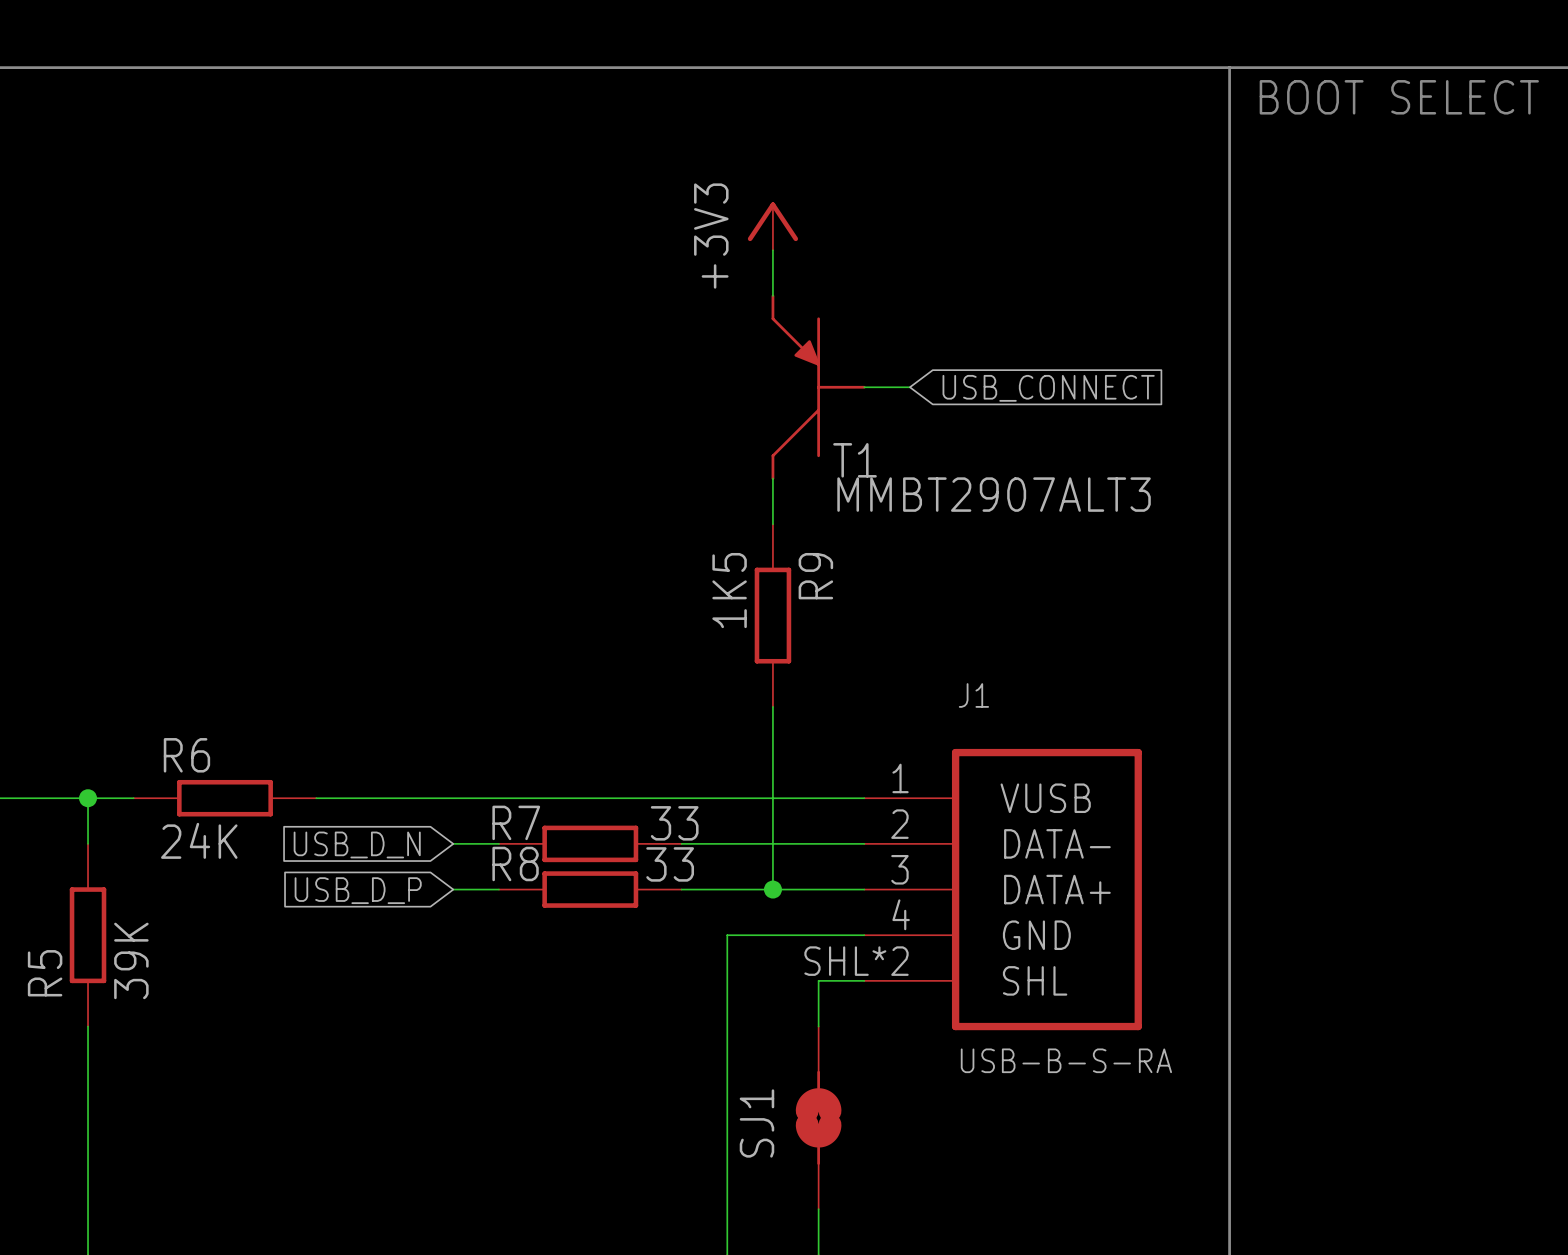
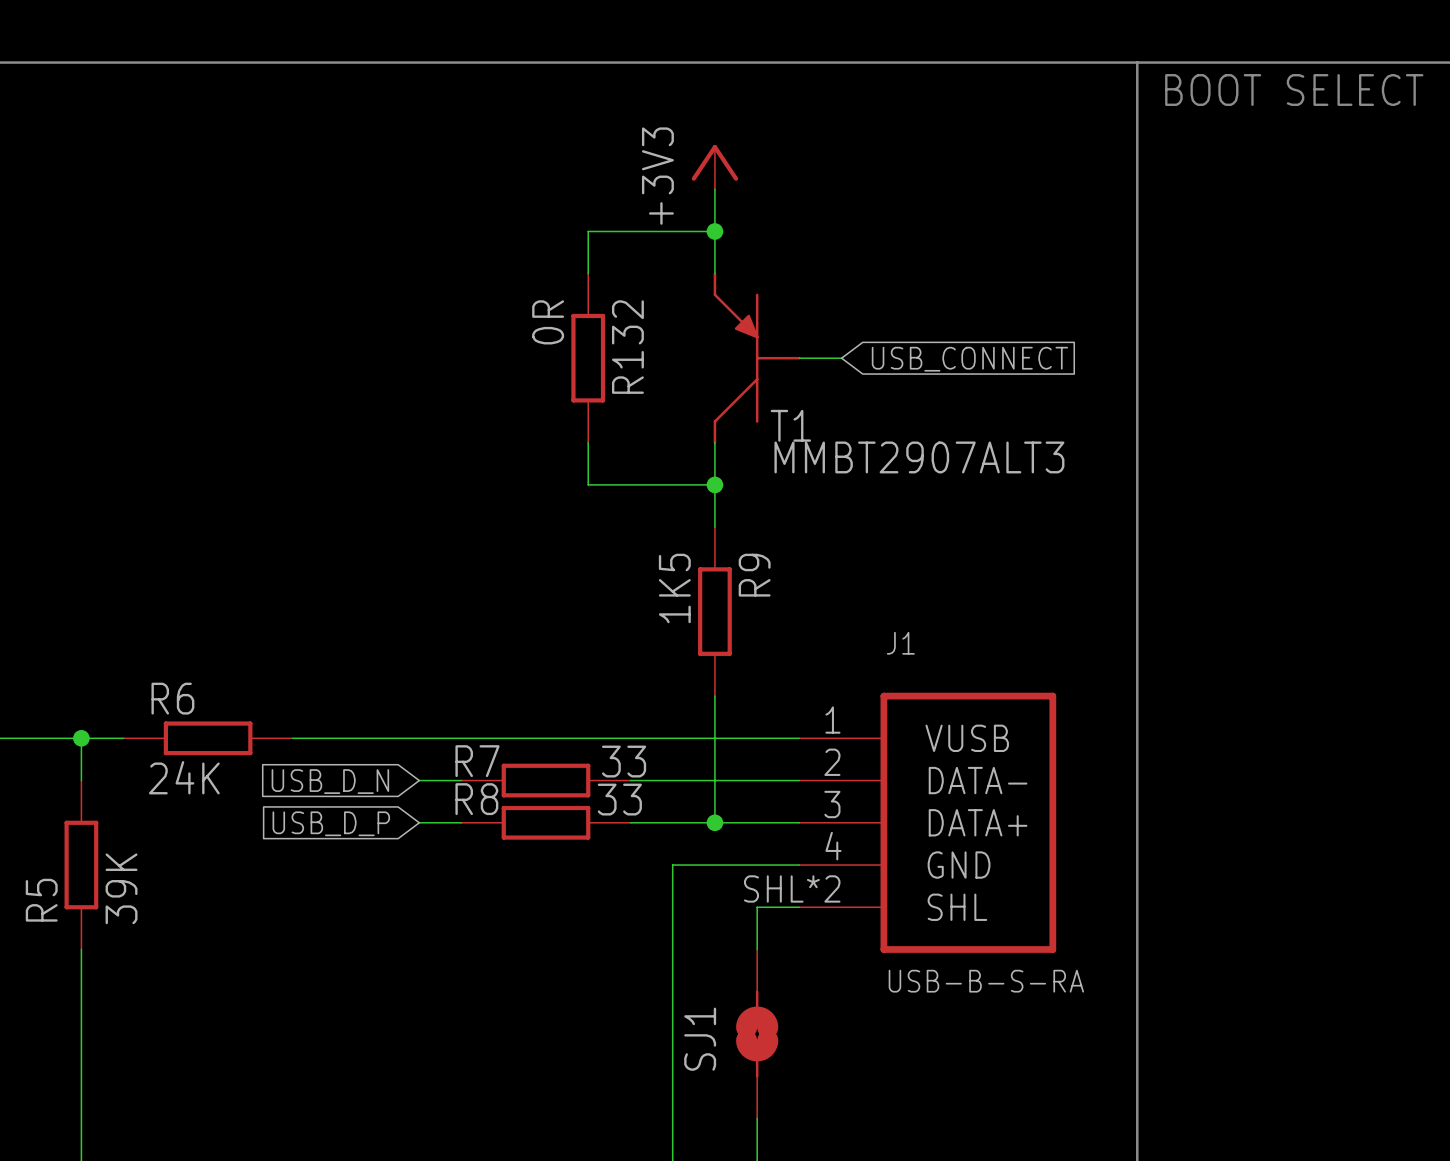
wire: none -> (714, 189) (714, 231) (588, 231) (588, 273)
power symbol position: +3V3 (772, 226) -> +3V3 (714, 167)
junction: none -> (714, 231)
R132: none -> 0R (588, 358)
wire: none -> (588, 442) (588, 484) (714, 484) (714, 527)
junction: none -> (714, 484)
R9 position: (772, 615) -> (714, 611)

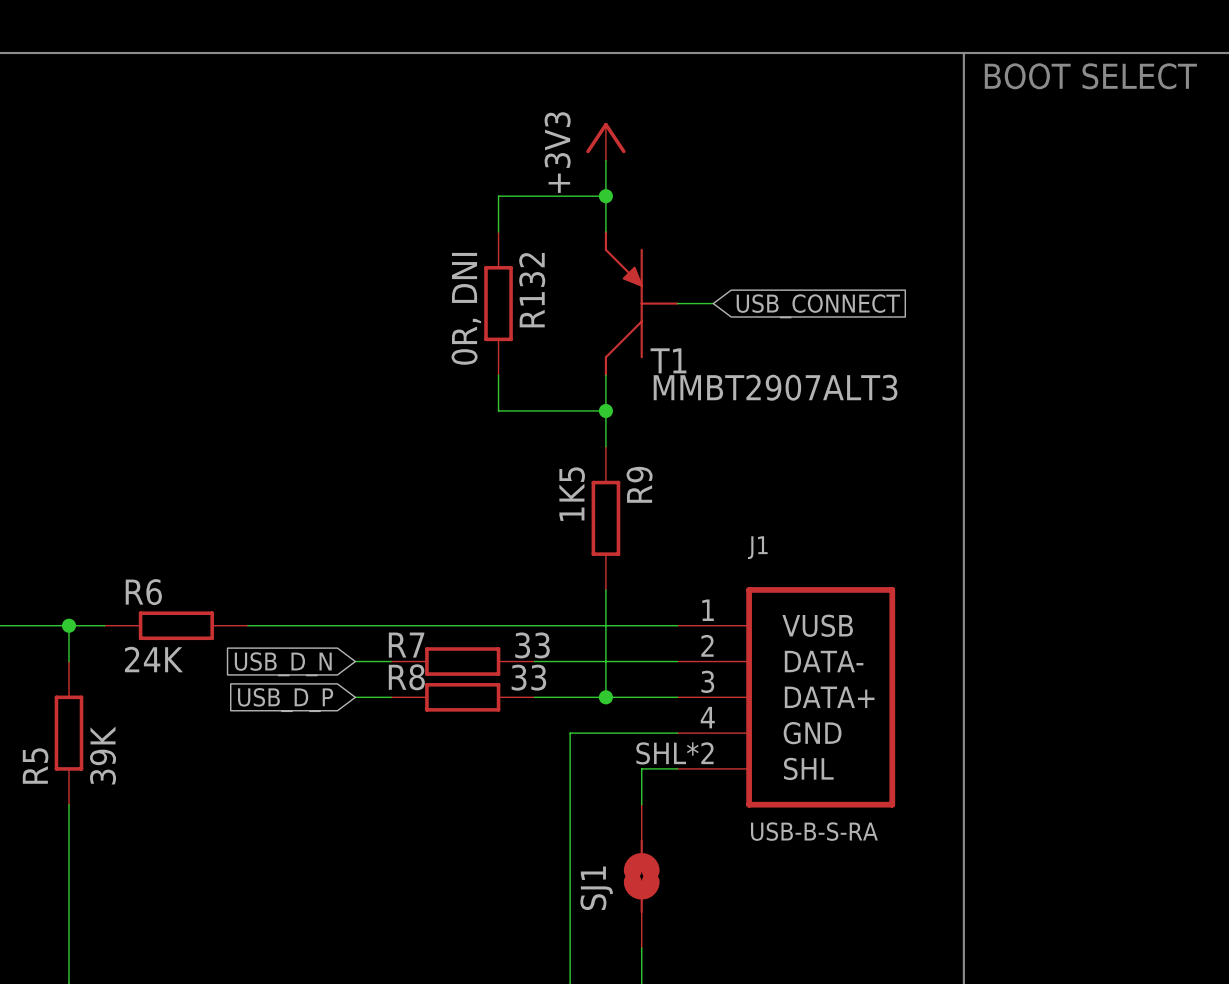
R132 value: 0R (548, 322) -> 0R, DNI (466, 308)

